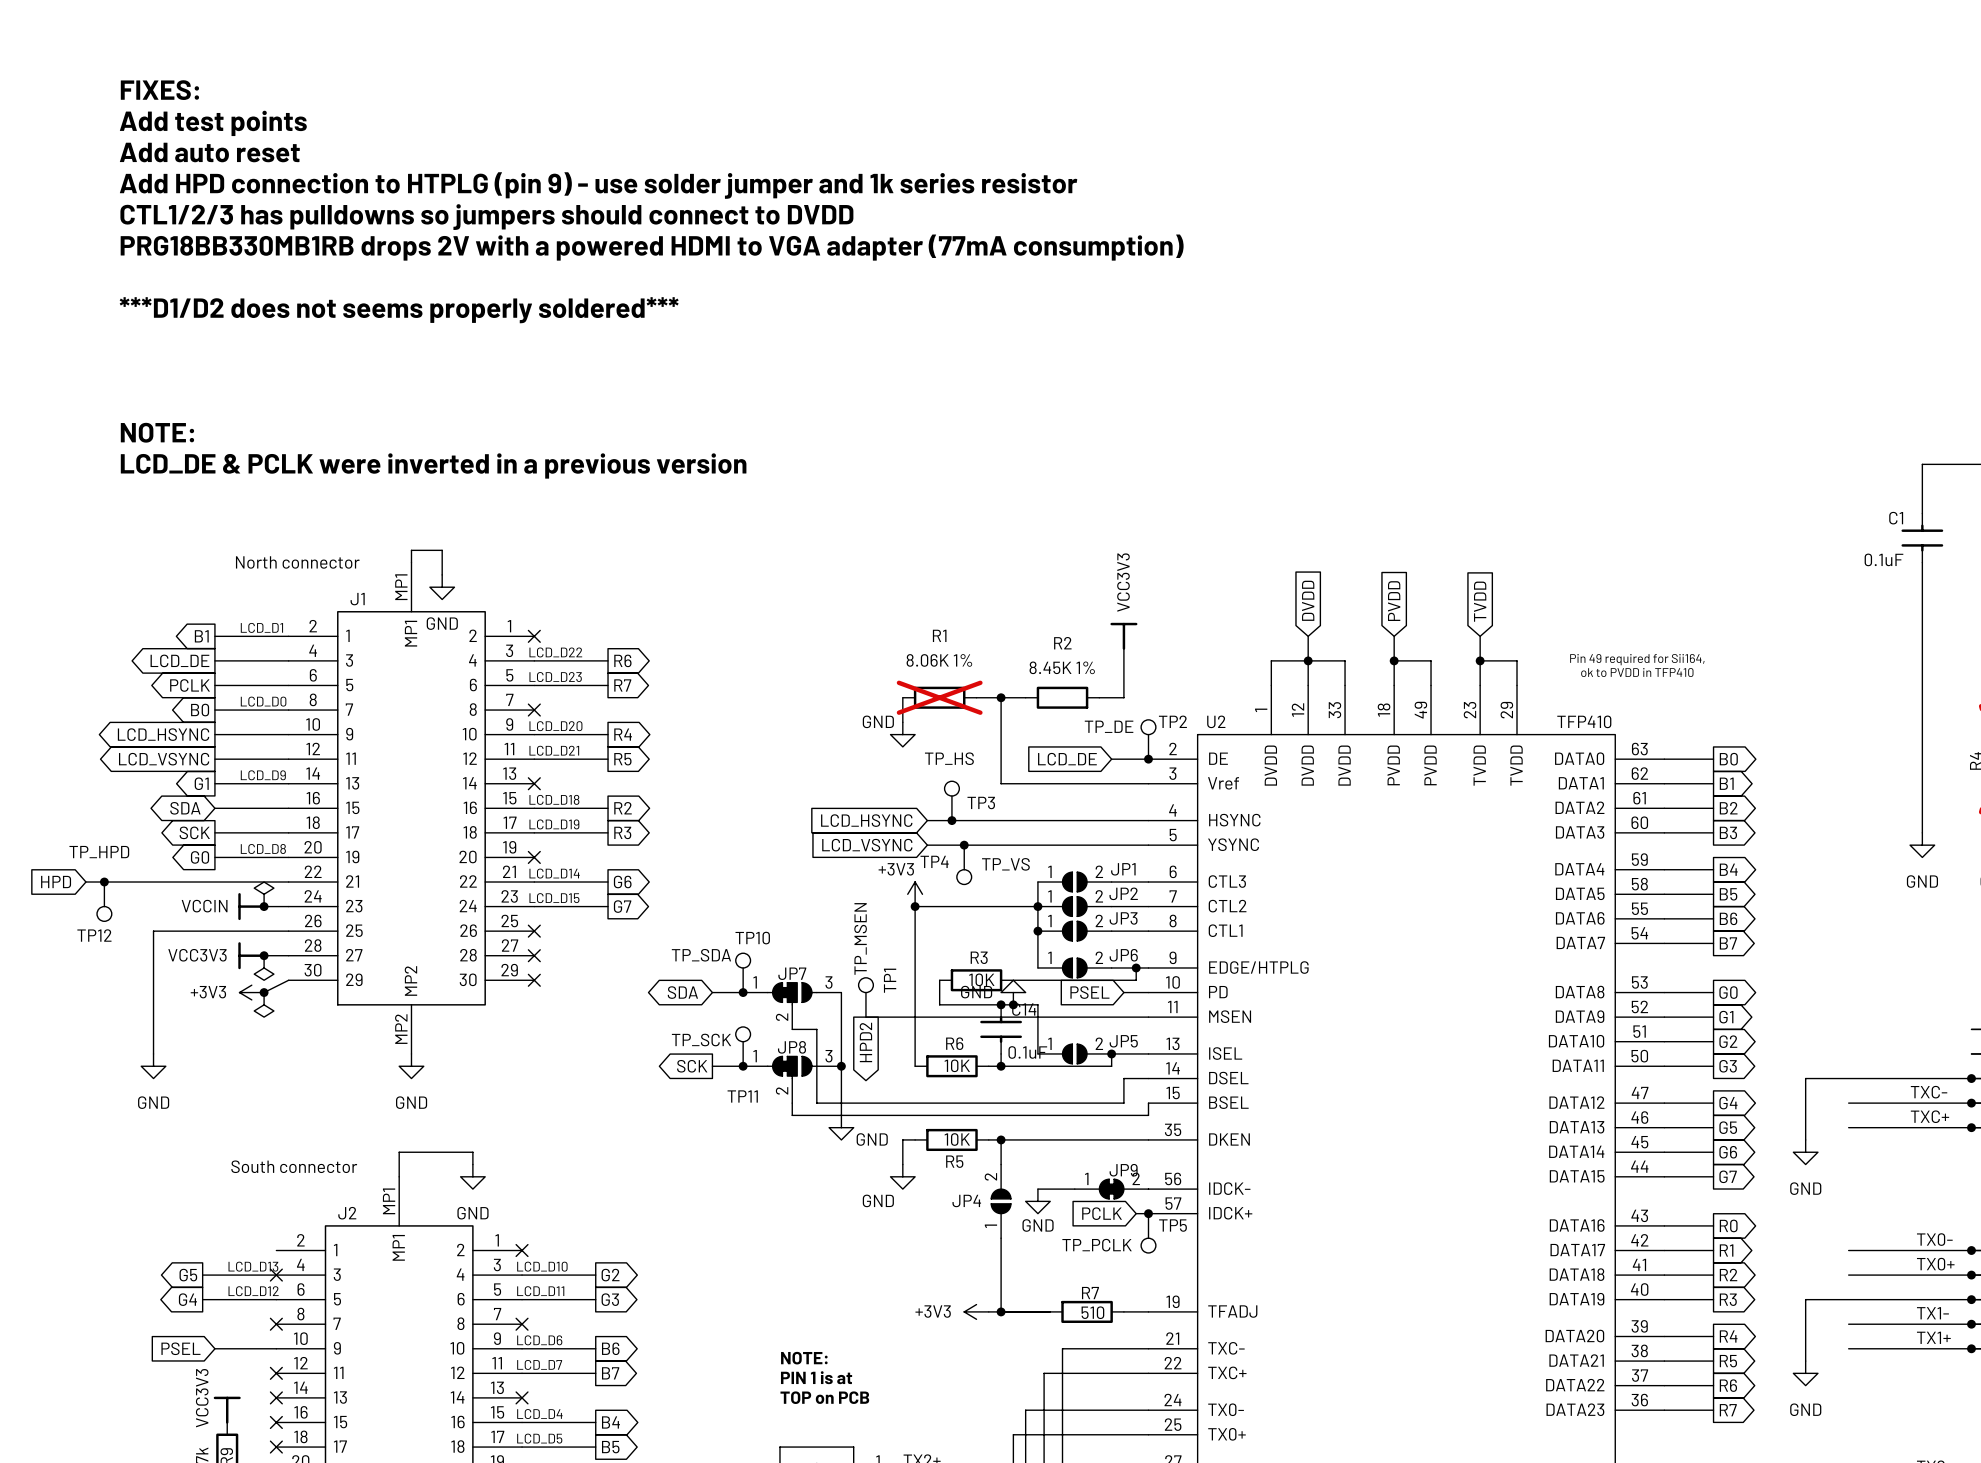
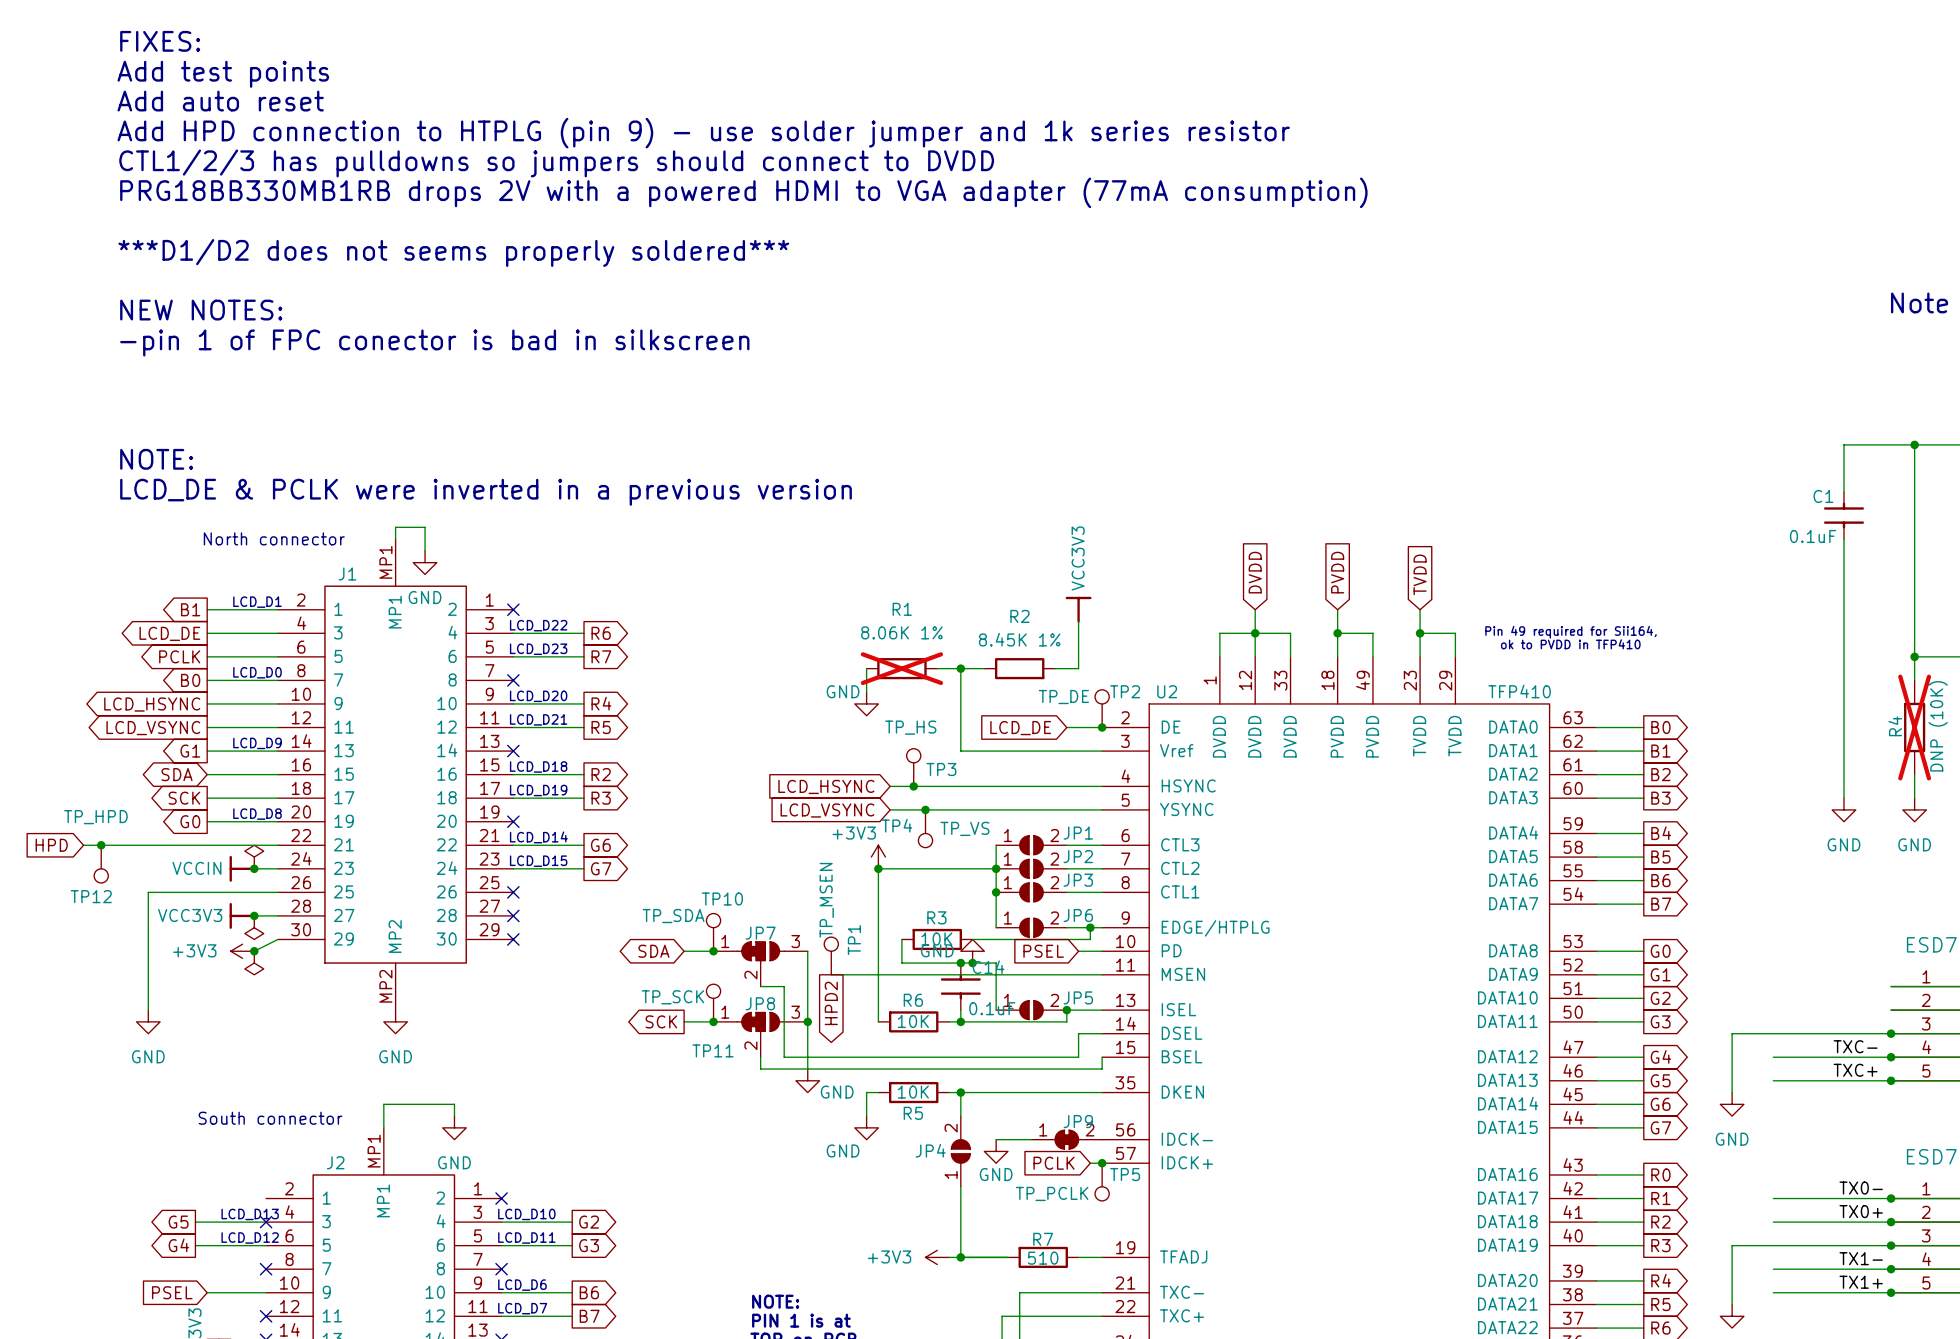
text position: FIXES: (159, 90) -> FIXES: (160, 41)
text position: Add test points (213, 123) -> Add test points (223, 74)
text position: Add auto reset (209, 152) -> Add auto reset (220, 101)
text position: Add HPD connection to HTPLG (pin 9) - use solder jumper and 1k series resistor (598, 185) -> Add HPD connection to HTPLG (pin 9) - use solder jumper and 1k series resistor (703, 133)
text position: CTL1/2/3 has pulldowns so jumpers should connect to DVDD (486, 217) -> CTL1/2/3 has pulldowns so jumpers should connect to DVDD (556, 163)
text position: PRG18BB330MB1RB drops 2V with a powered HDMI to VGA adapter (77mA consumption) (652, 247) -> PRG18BB330MB1RB drops 2V with a powered HDMI to VGA adapter (77mA consumption) (743, 192)
text position: ***D1/D2 does not seems properly soldered*** (399, 310) -> ***D1/D2 does not seems properly soldered*** (453, 252)
text: none -> NEW NOTES: (201, 310)
text: none -> -pin 1 of FPC conector is bad in silkscreen (434, 342)
text position: NOTE: (157, 432) -> NOTE: (156, 459)
text position: LCD_DE & PCLK were inverted in a previous version (433, 465) -> LCD_DE & PCLK were inverted in a previous version (486, 492)

